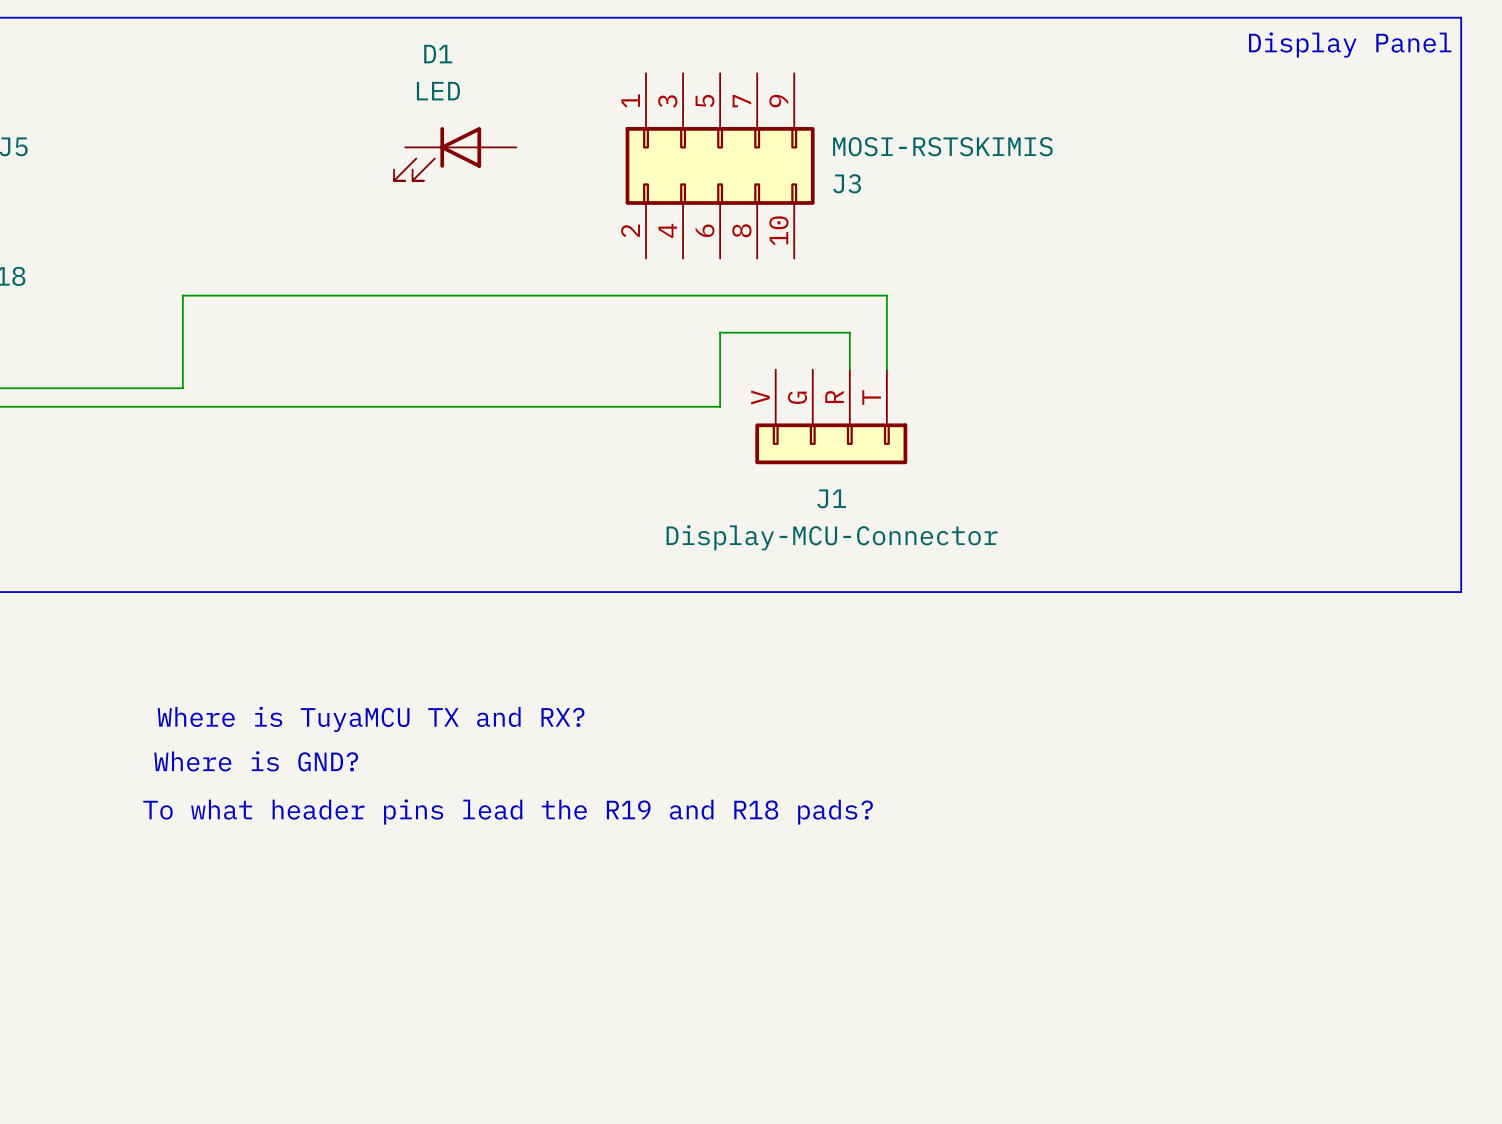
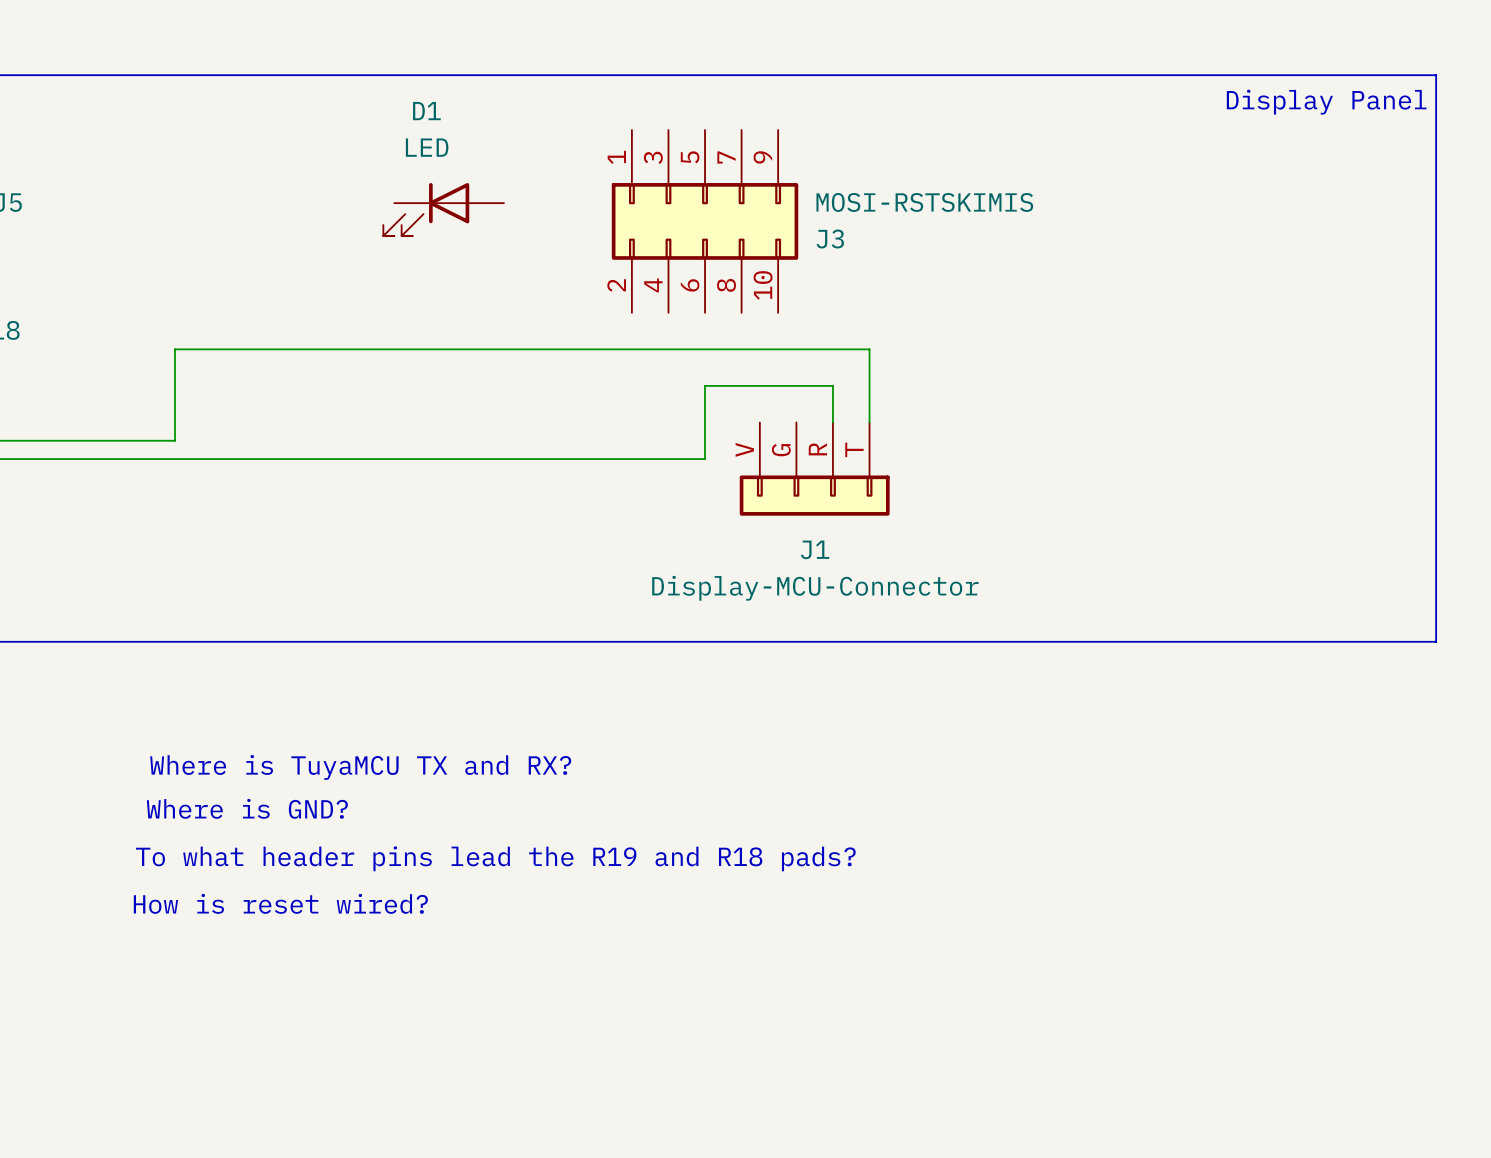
text: none -> How is reset wired? (280, 903)

